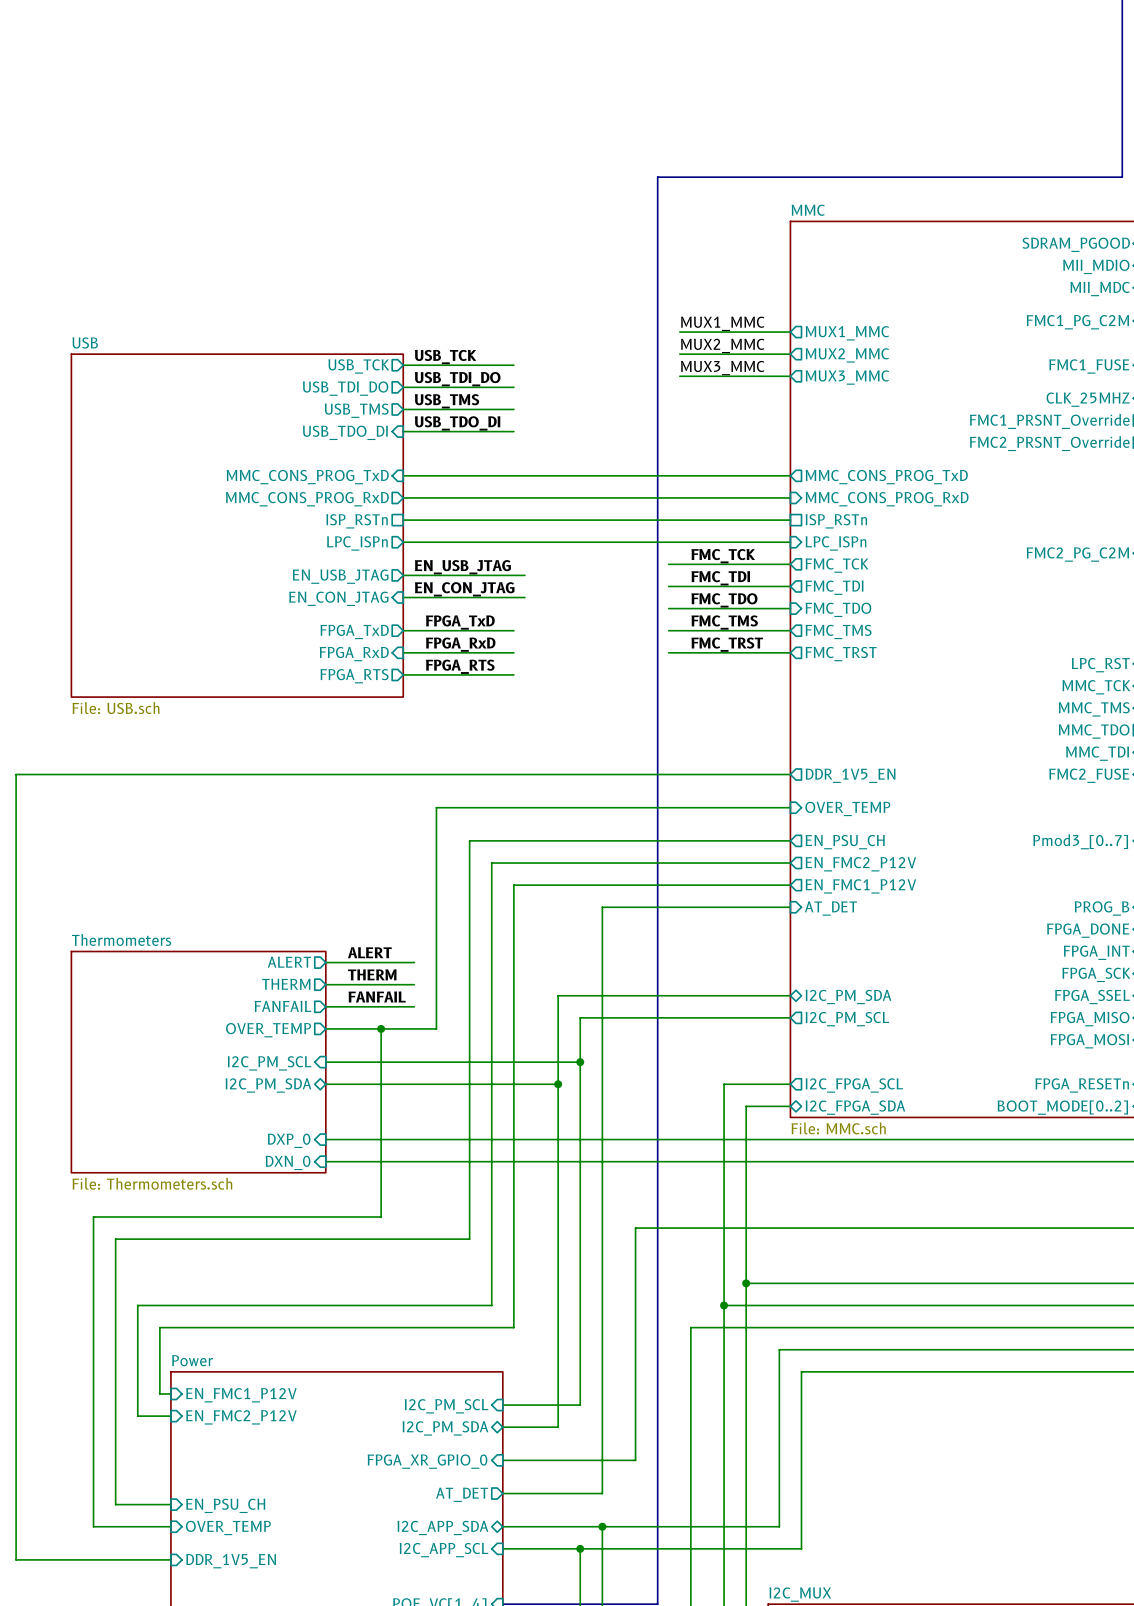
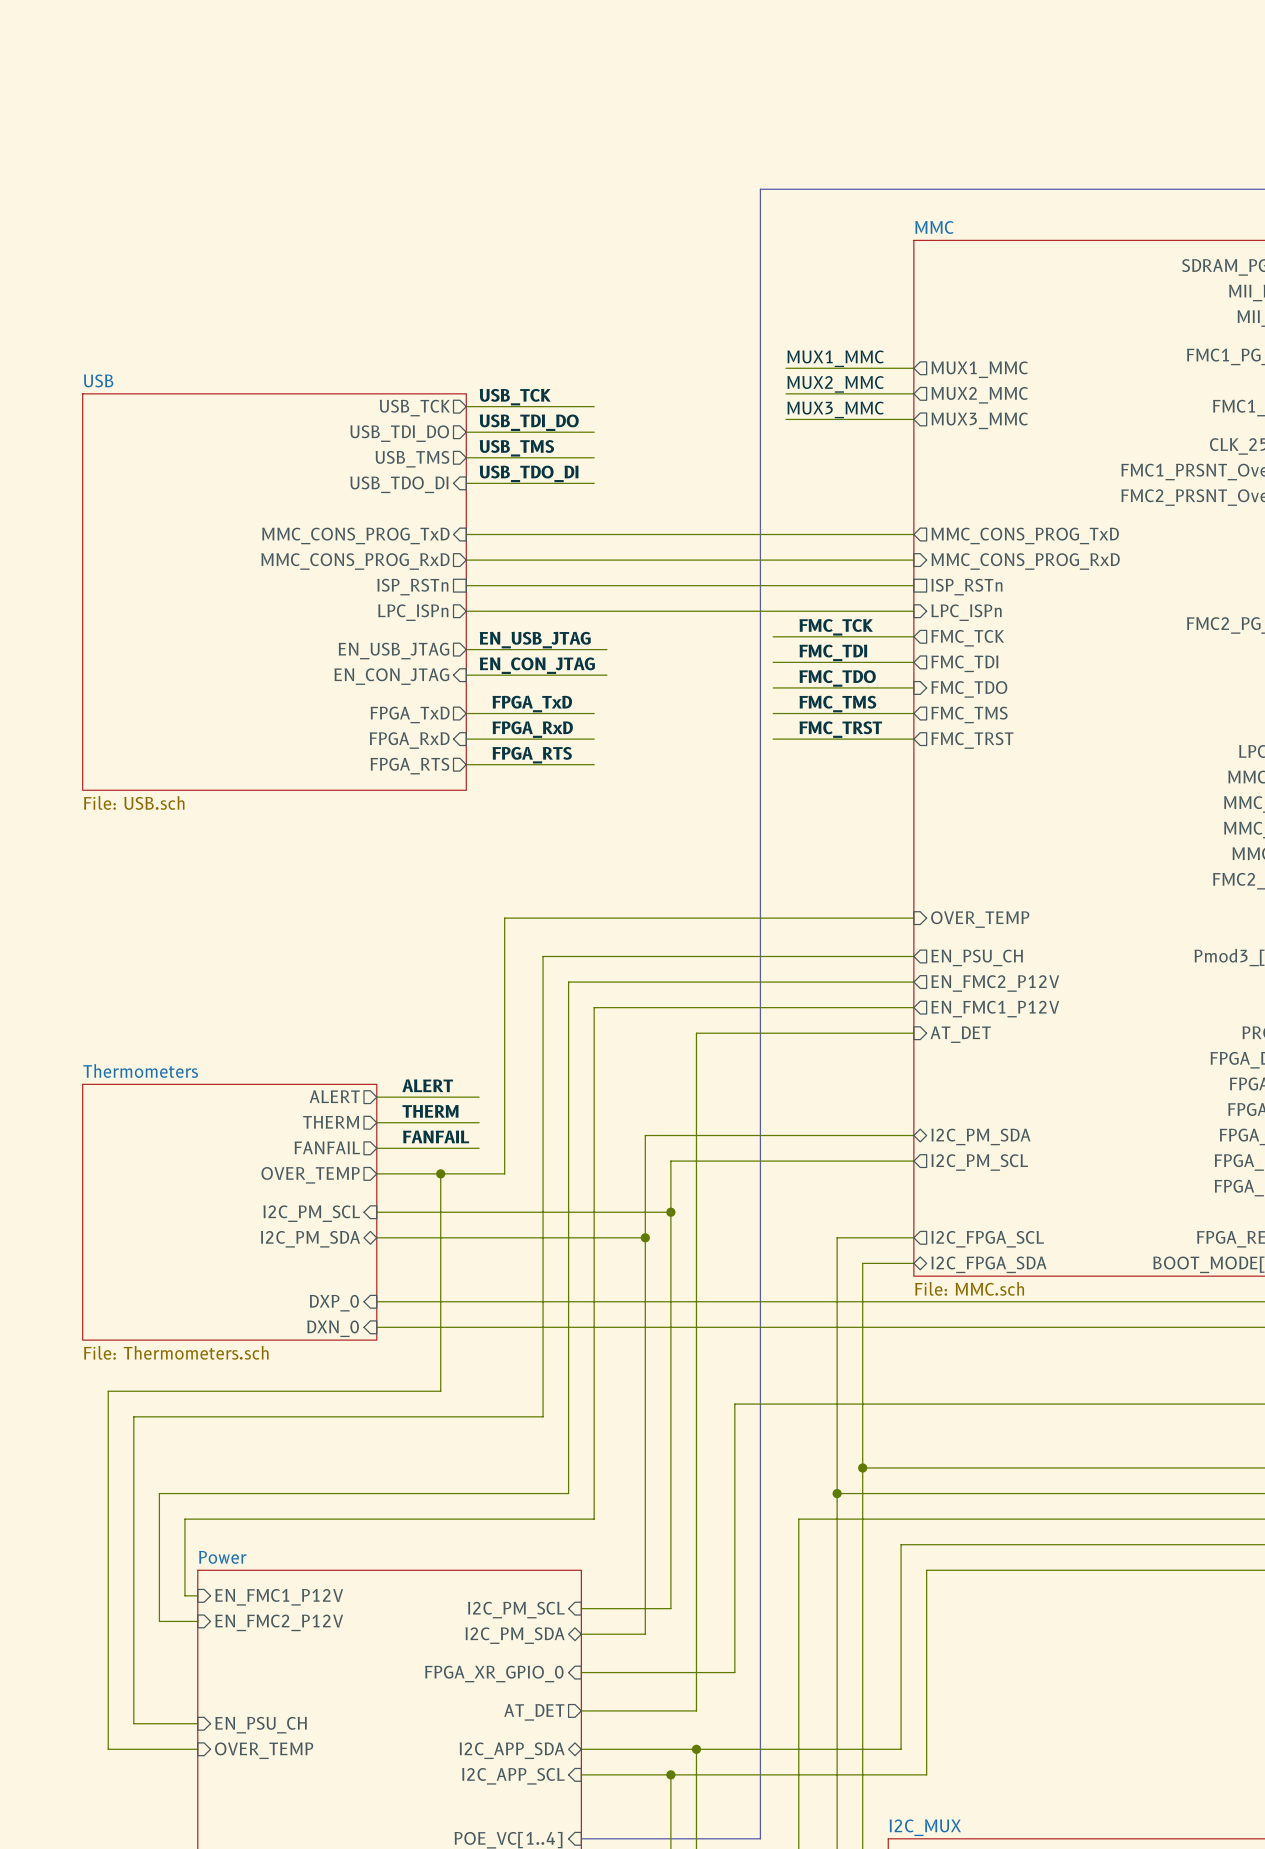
wire: (790, 774) (16, 774) (16, 1559) (170, 1559) -> none
sheet pin: DDR_1V5_EN (850, 775) -> none
sheet pin: DDR_1V5_EN (231, 1561) -> none

